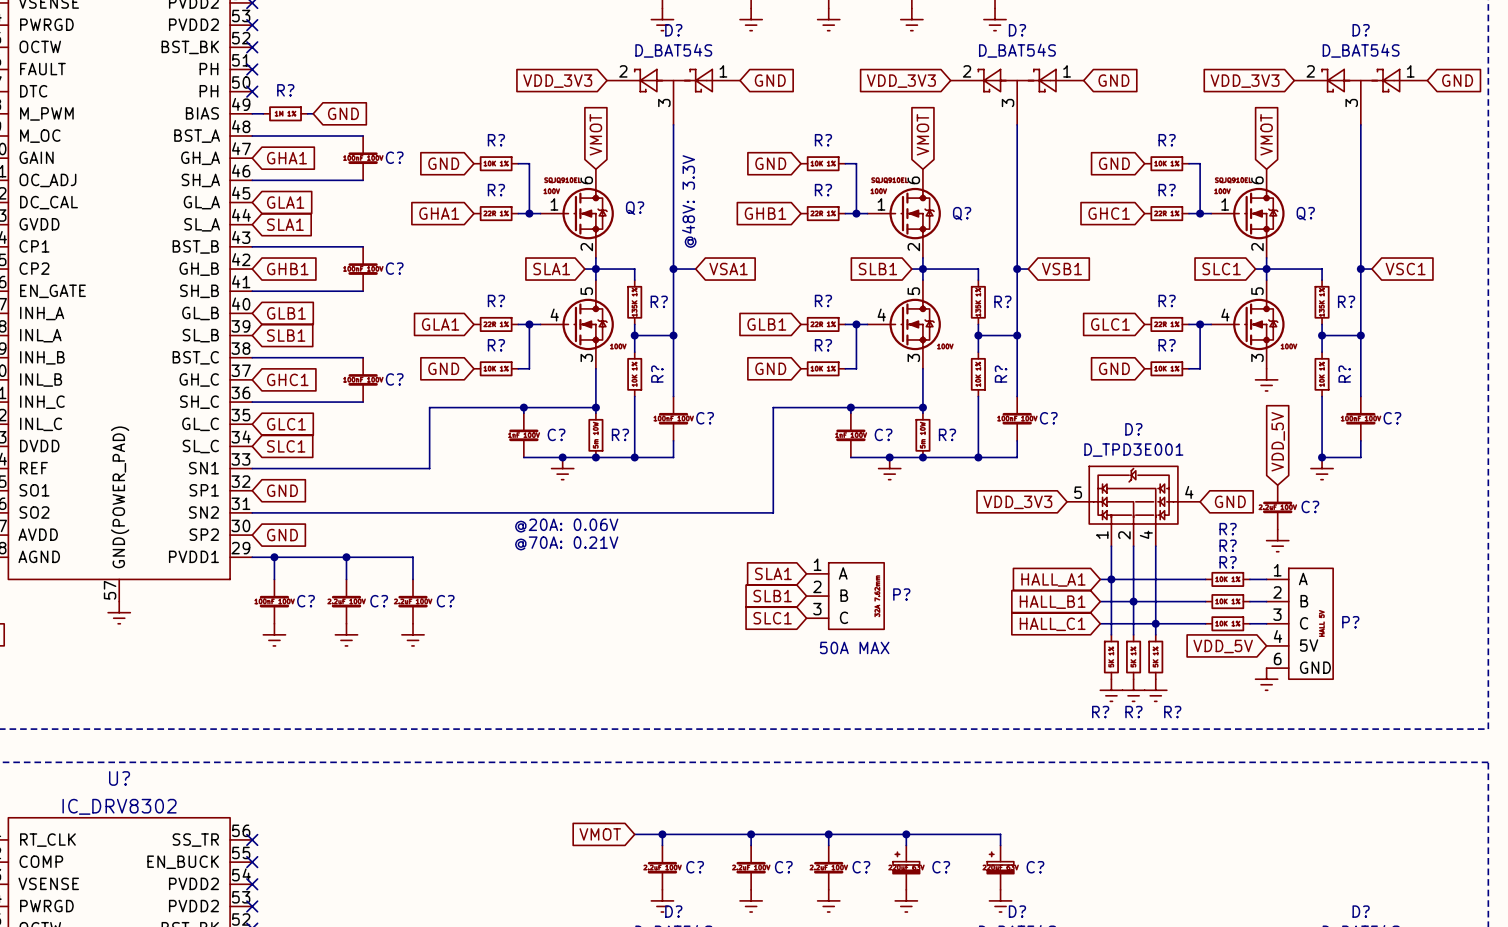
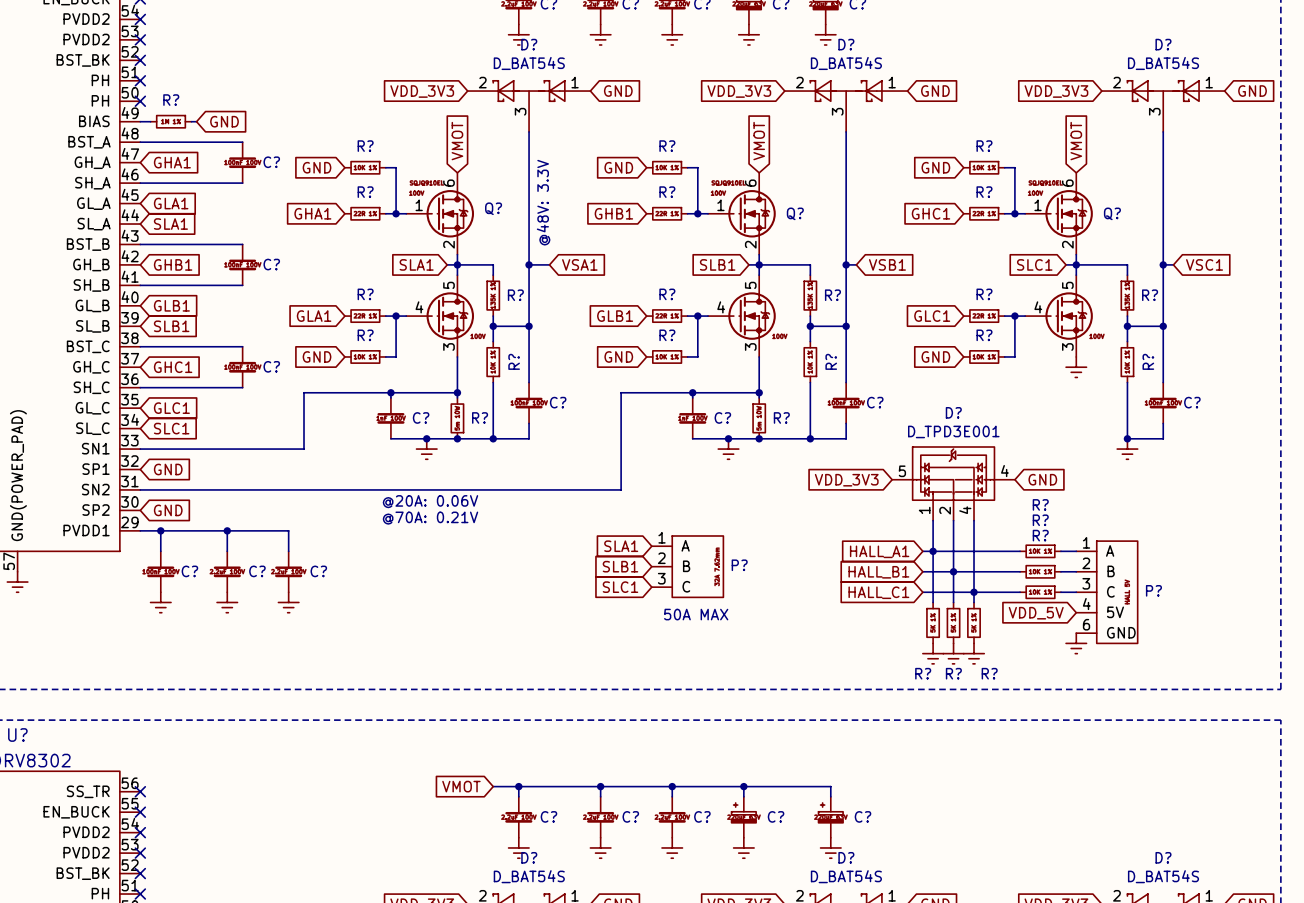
global label: VDD_5V (1278, 441) -> none
C?: (1277, 507) -> none
power symbol: (1277, 540) -> none

